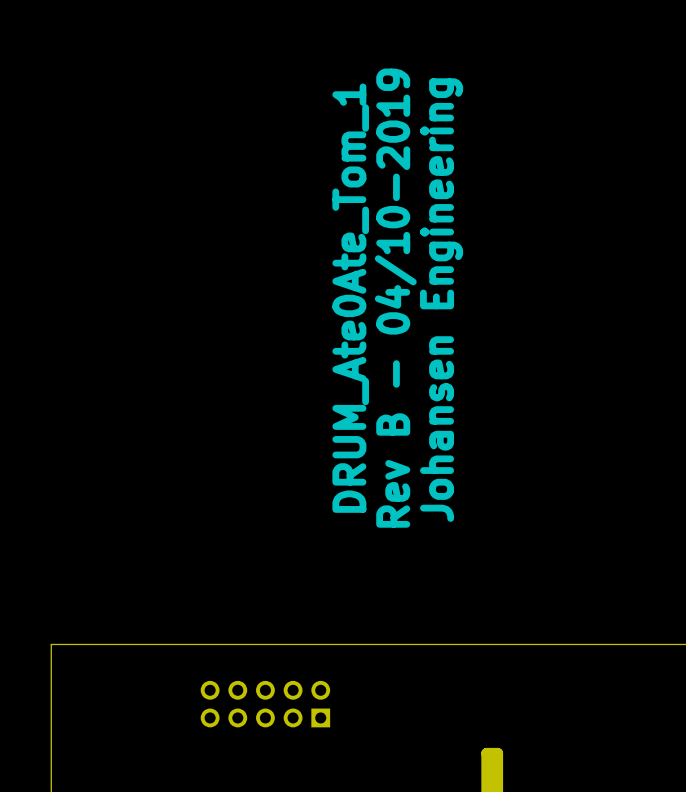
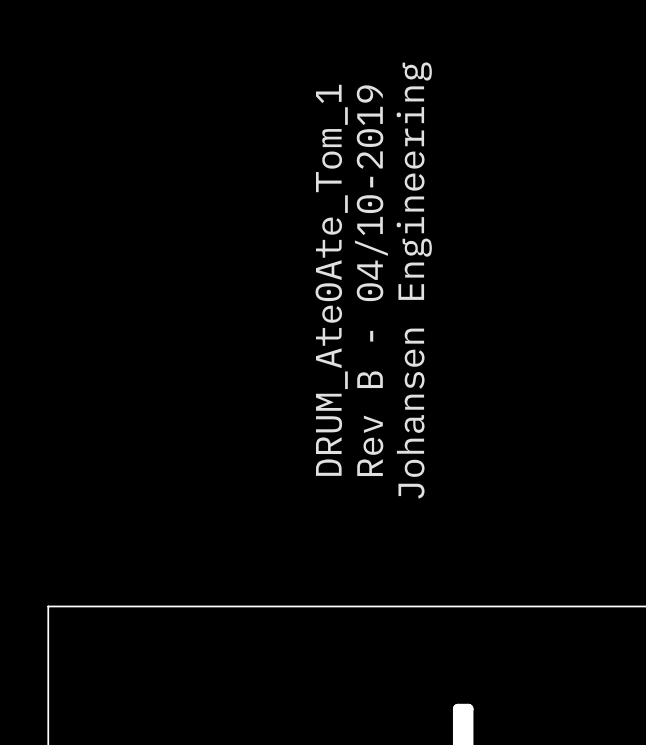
part: (265, 704) -> none

